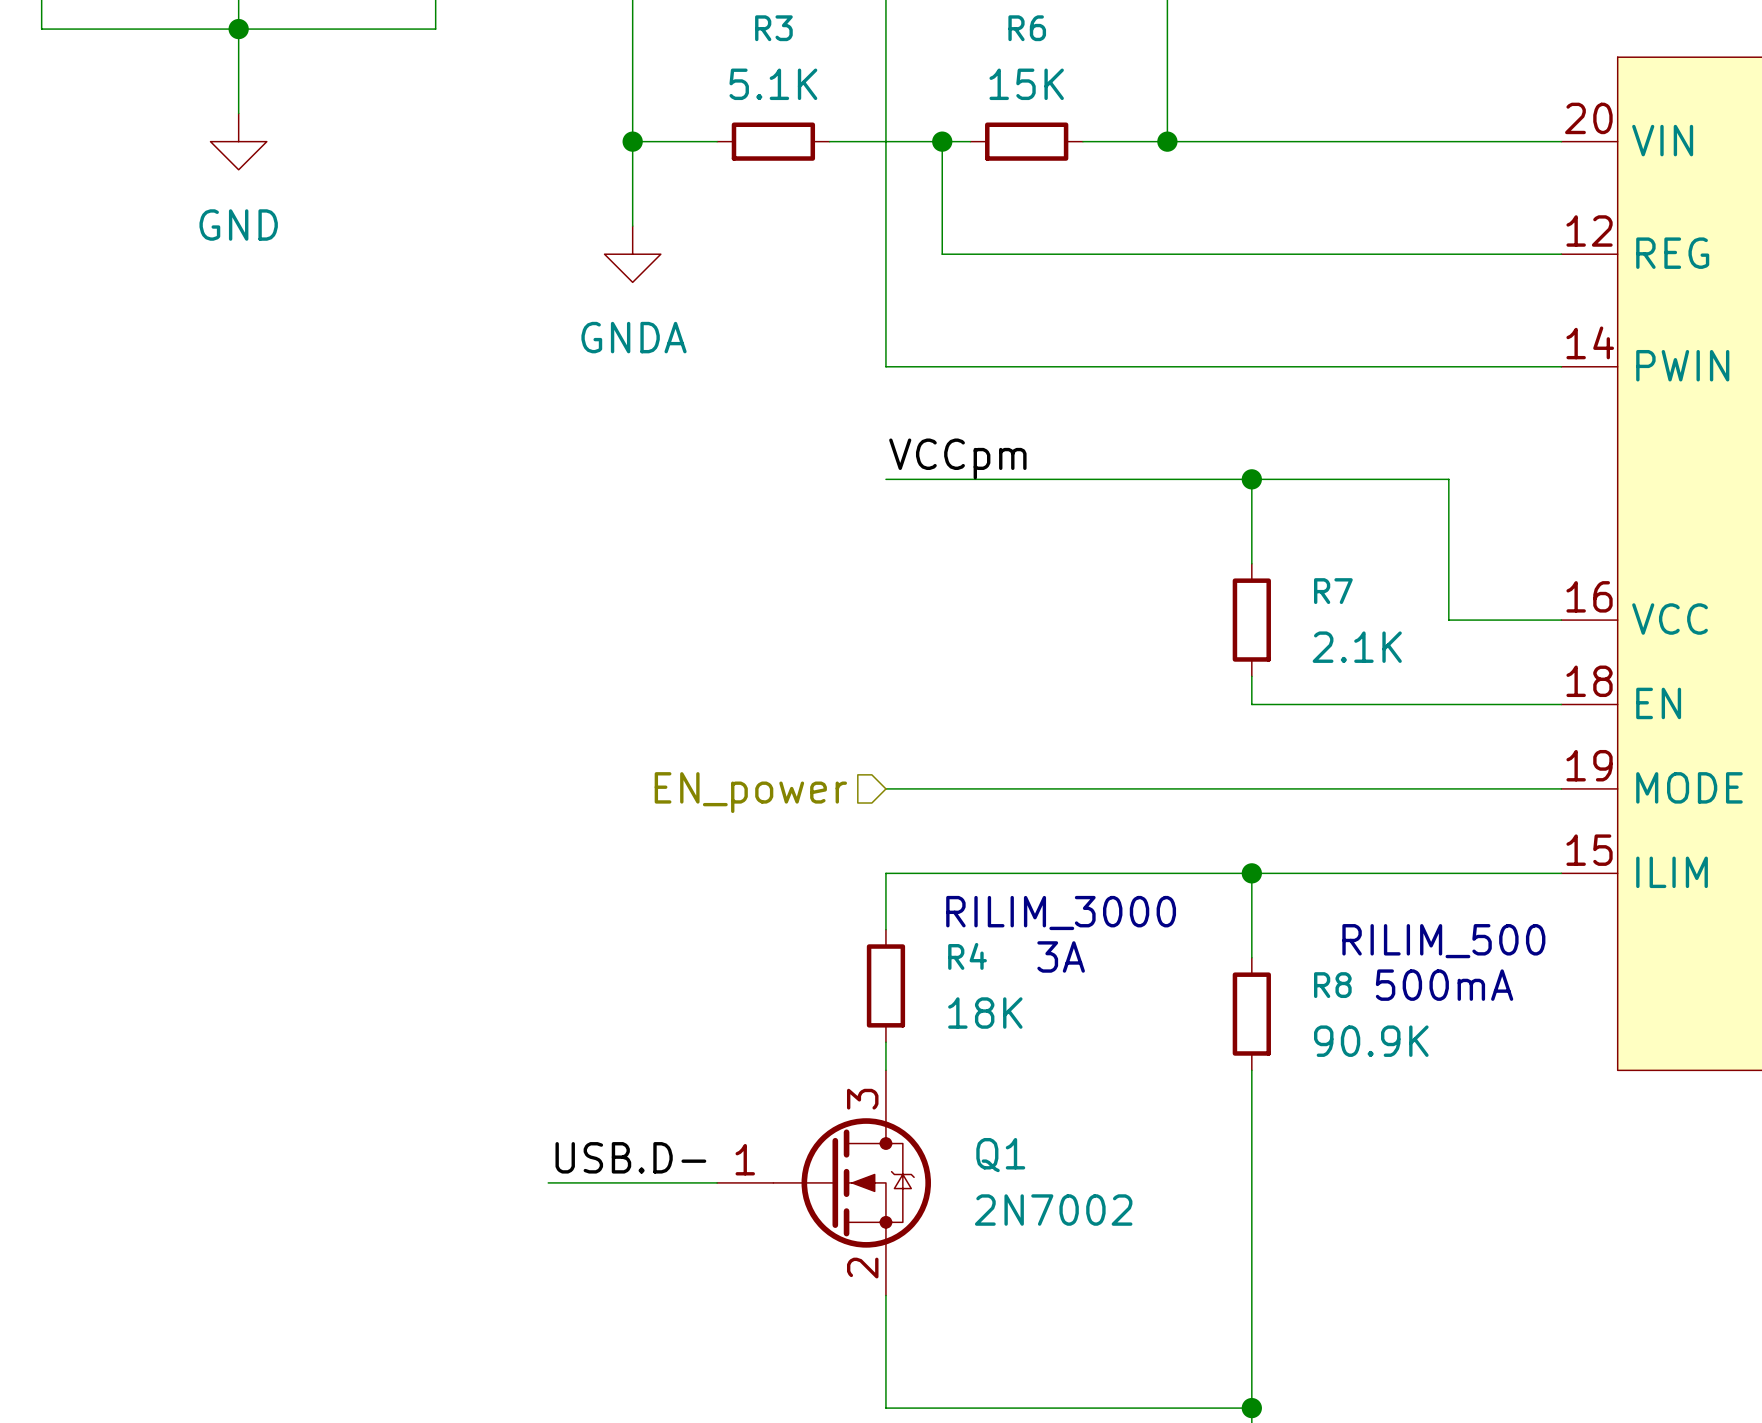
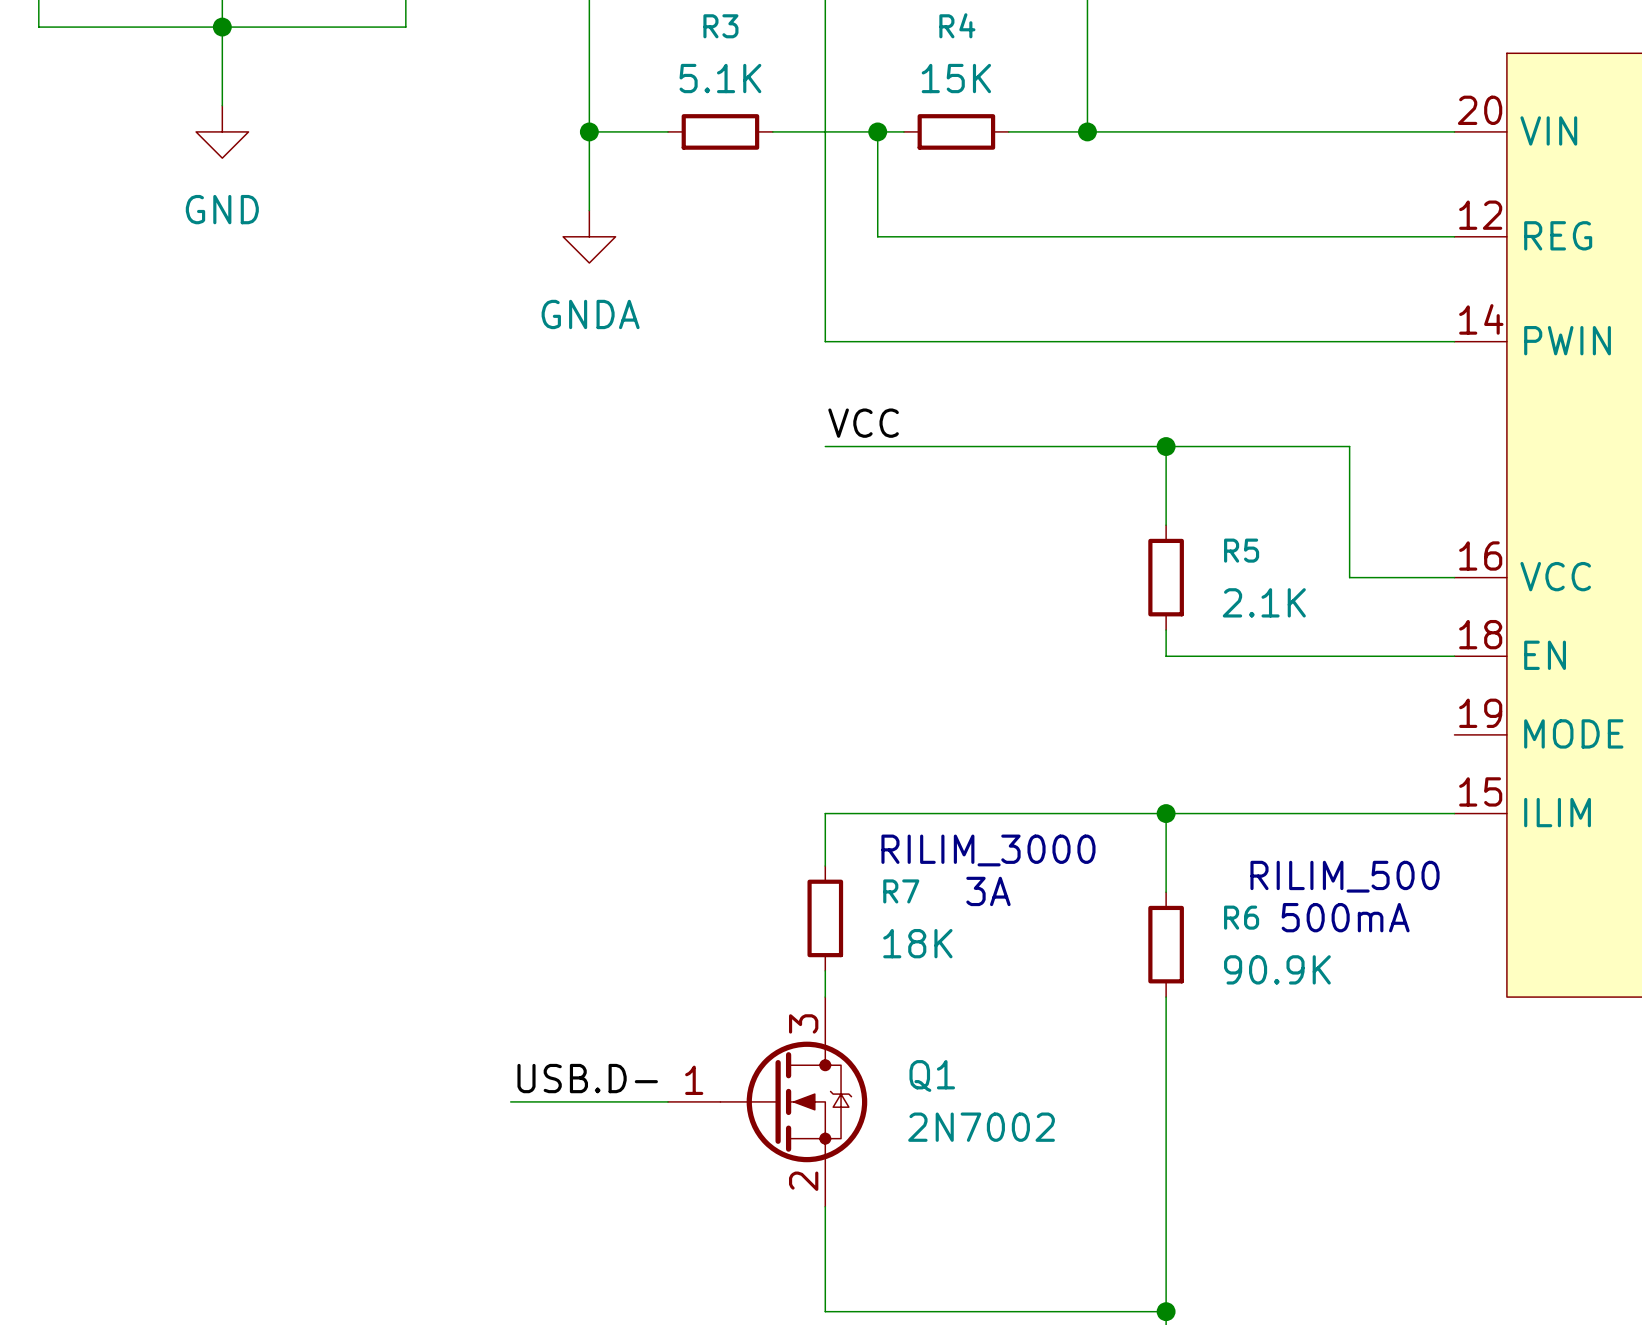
R6 name: R6 (1027, 28) -> R4 (957, 25)
label: VCCpm (957, 458) -> VCC (863, 423)
R7 name: R7 (1333, 591) -> R5 (1241, 550)
wire: (885, 788) (1561, 788) -> none
hierarchical label: EN_power (750, 792) -> none
R4 name: R4 (967, 956) -> R7 (901, 891)
R8 name: R8 (1332, 985) -> R6 (1241, 917)

